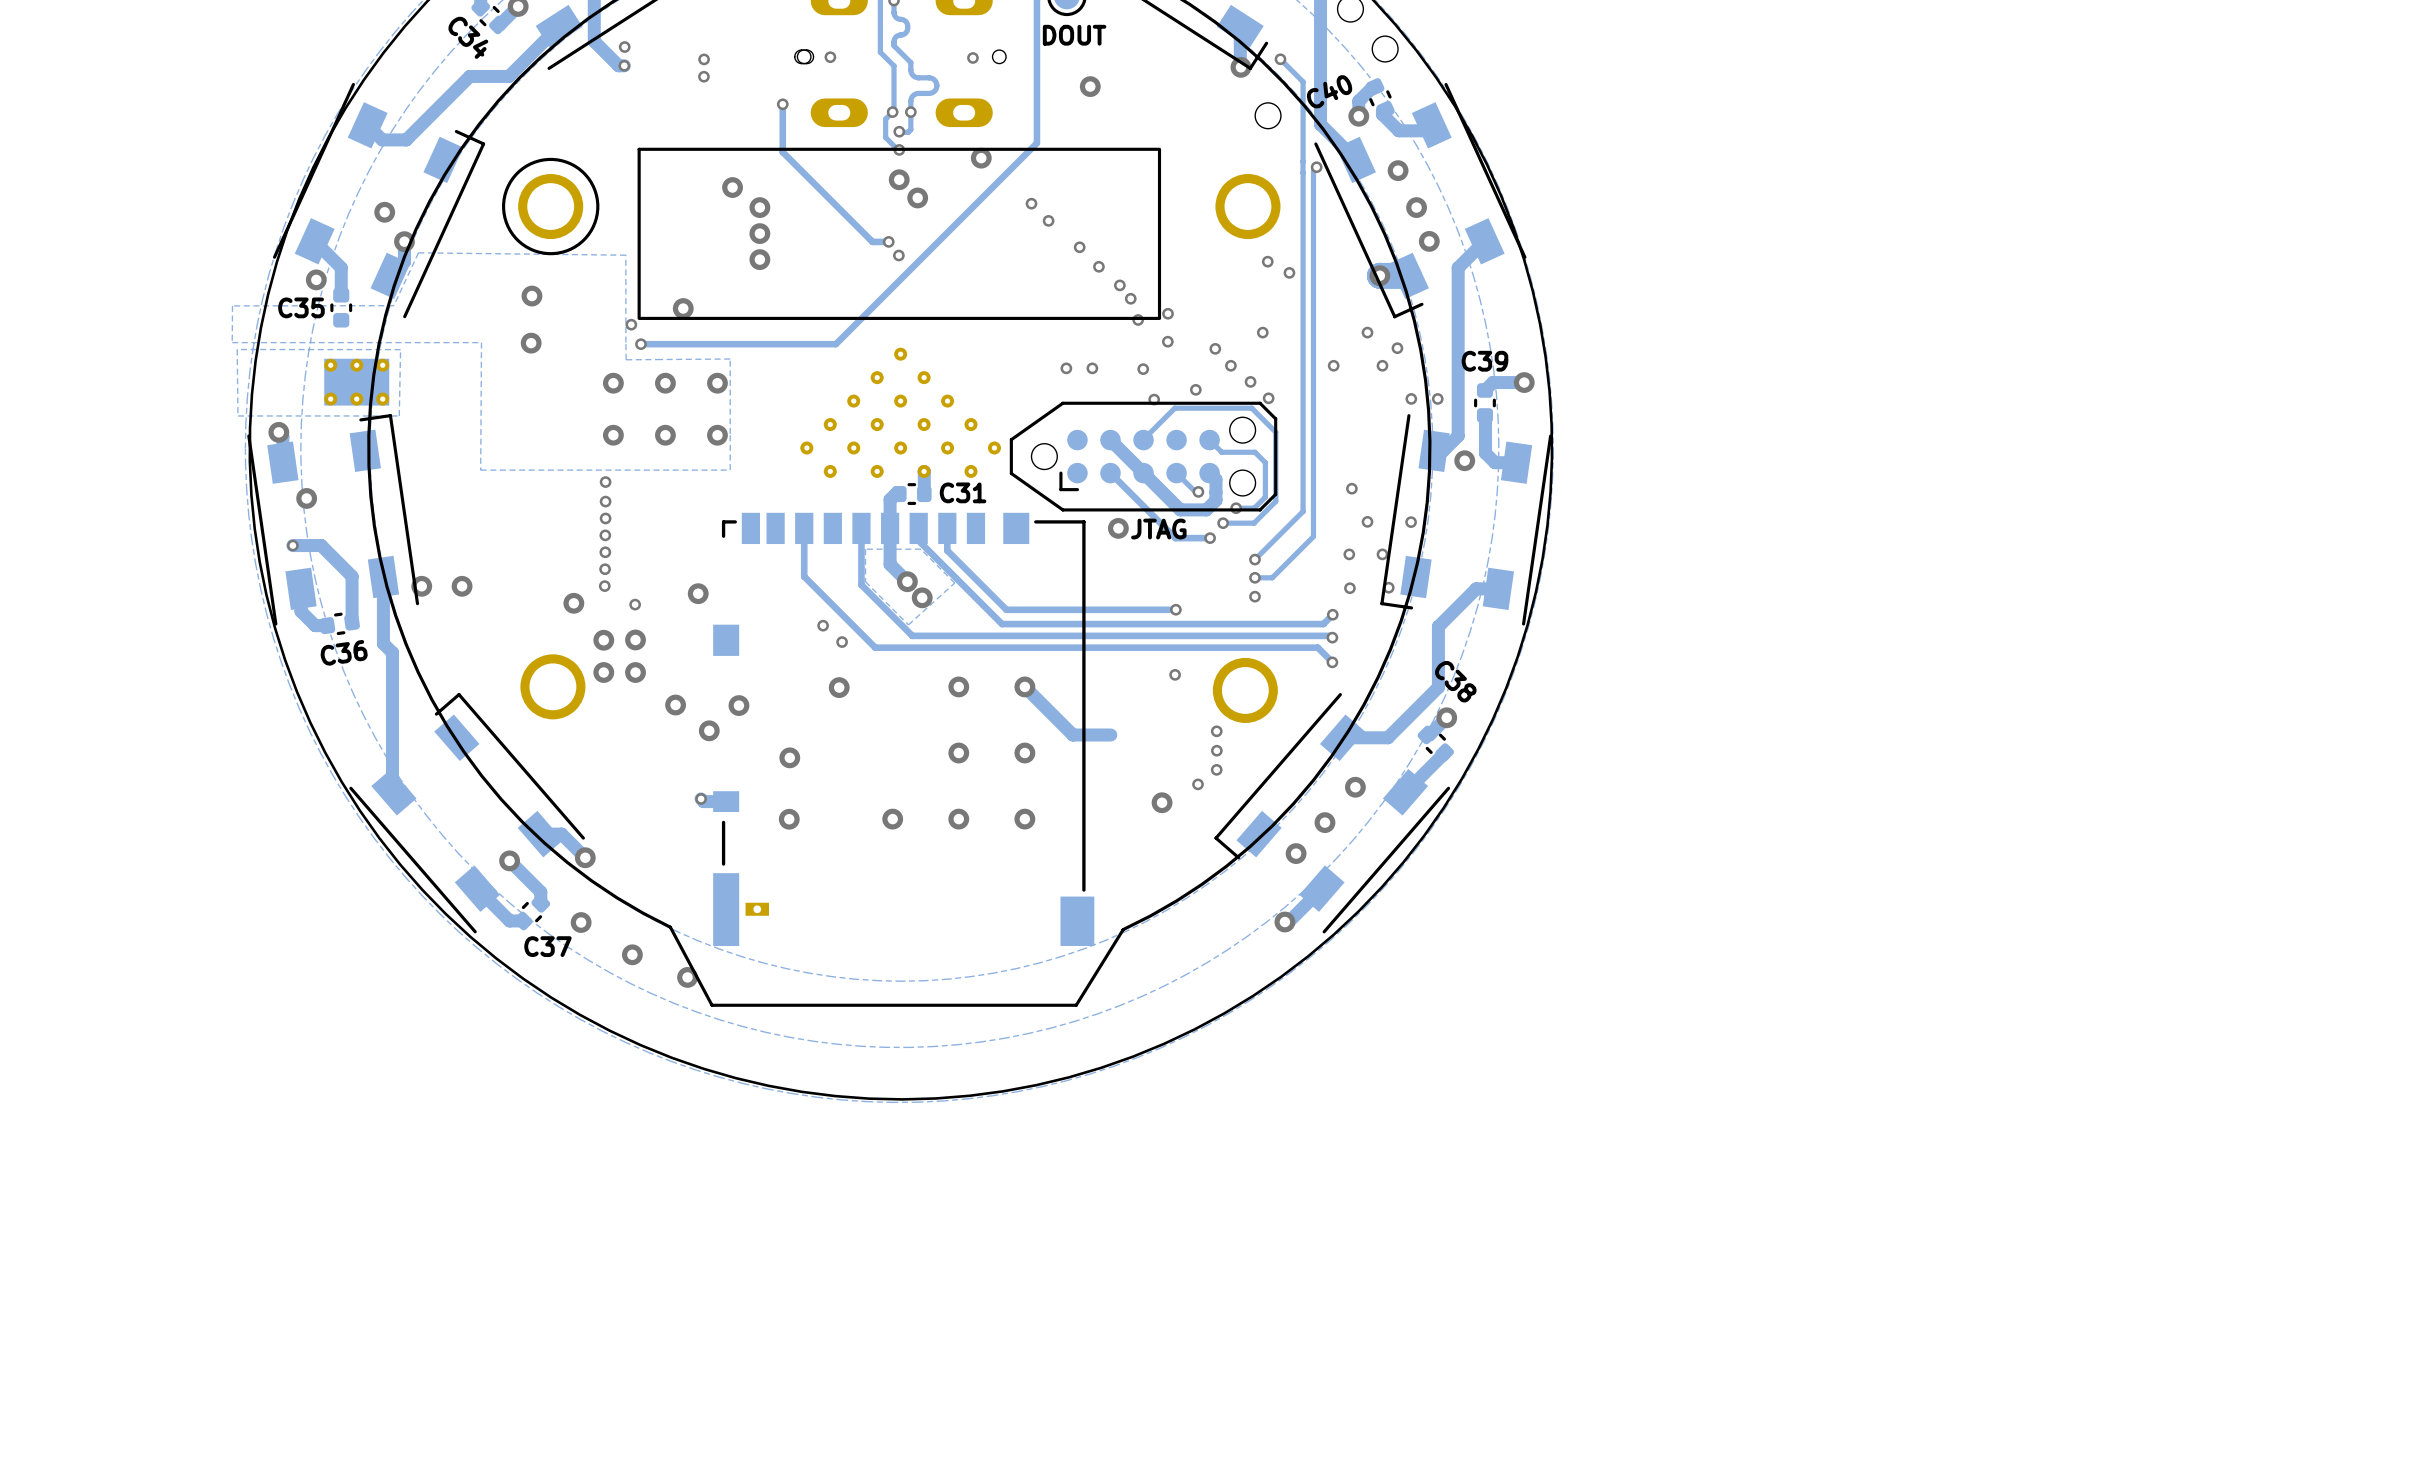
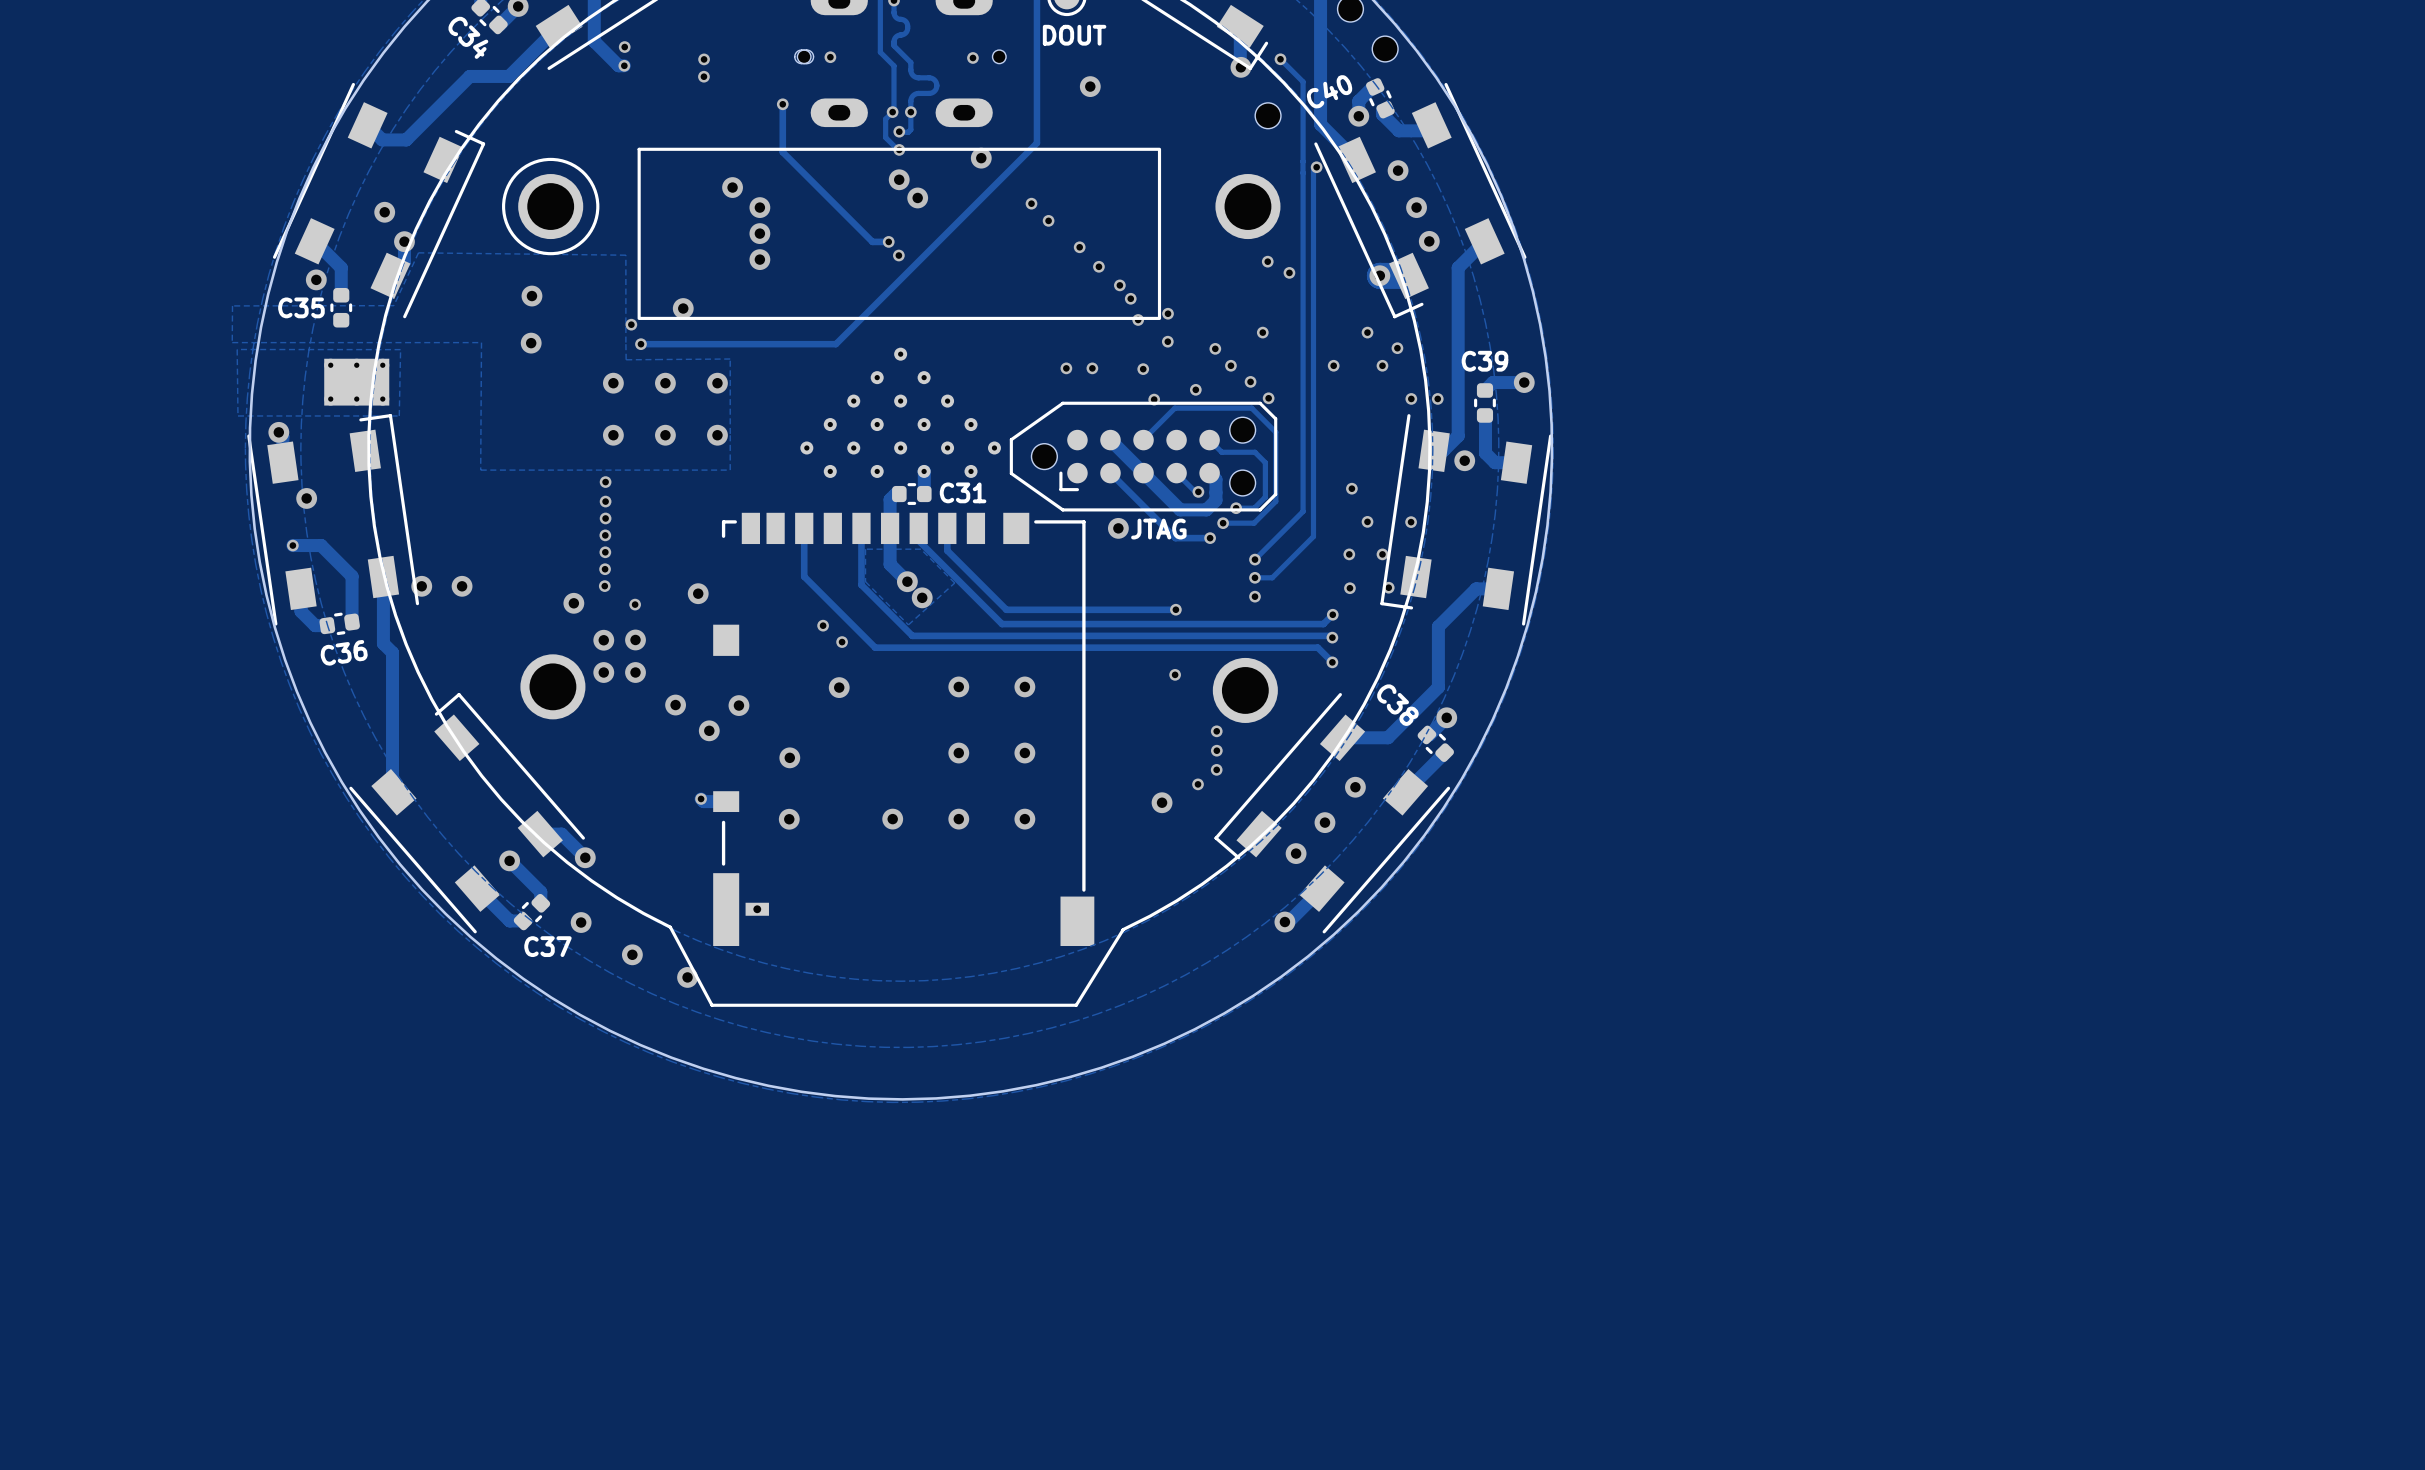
C38 name position: C38 (1455, 681) -> C38 (1397, 705)
track: (1024, 686) (1072, 735) (1110, 735) -> none

